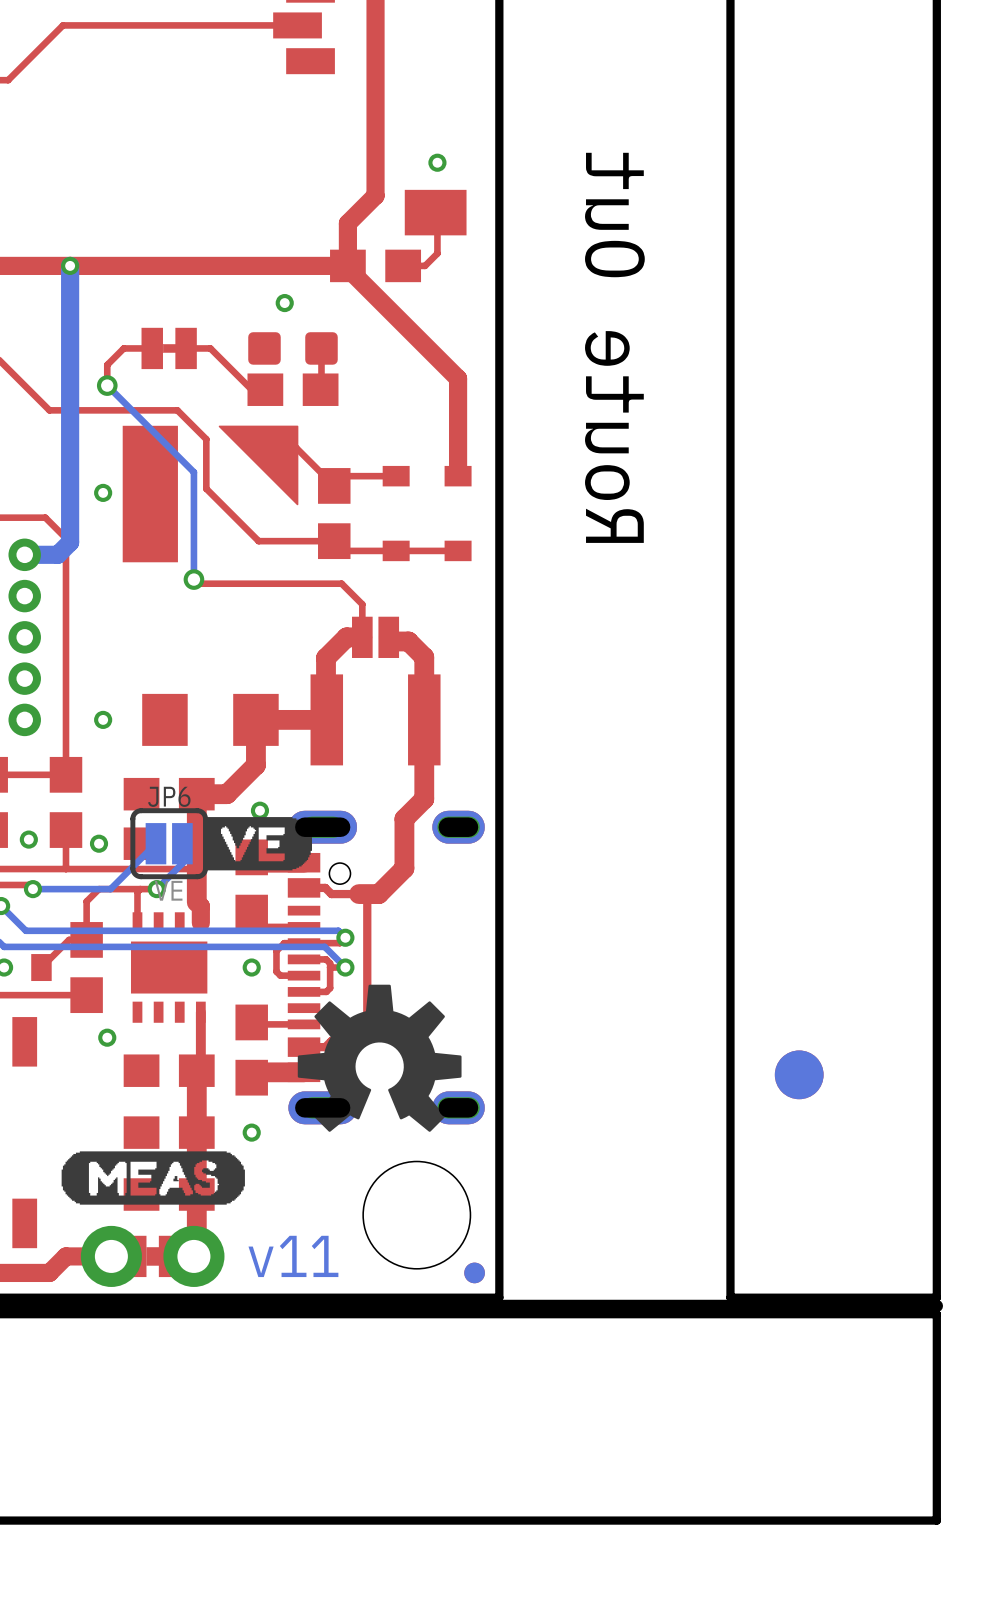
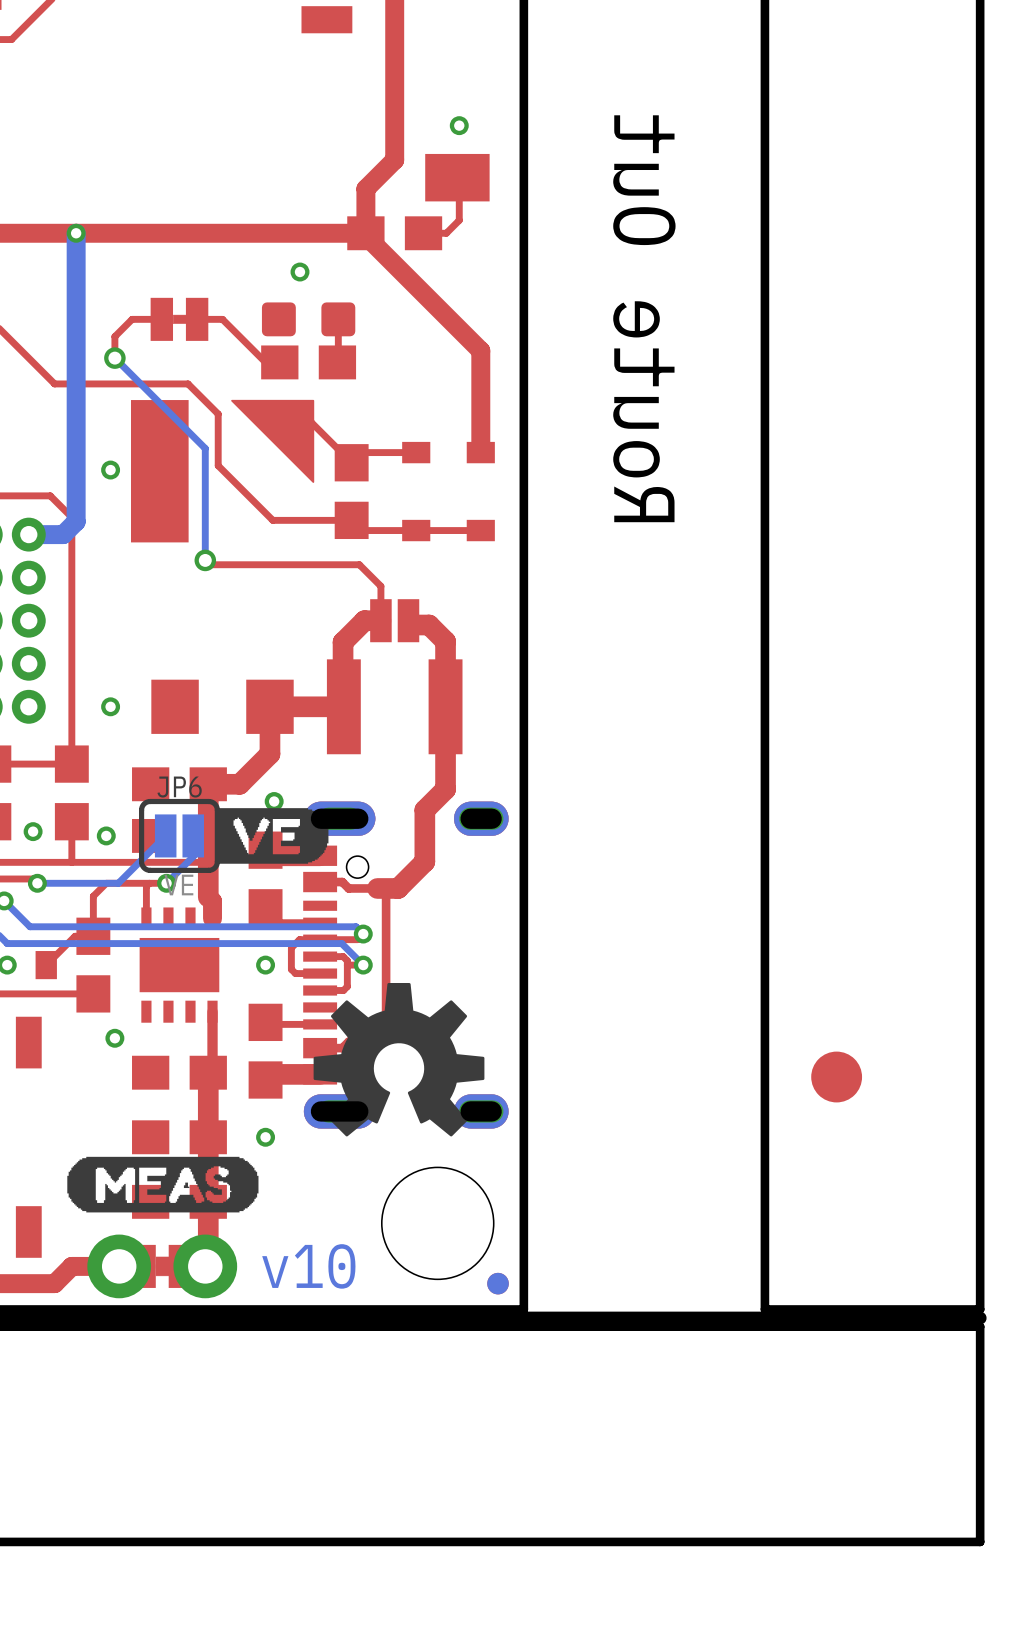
part: (799, 1074) -> none
text: v11 (293, 1256) -> v10 (308, 1266)

